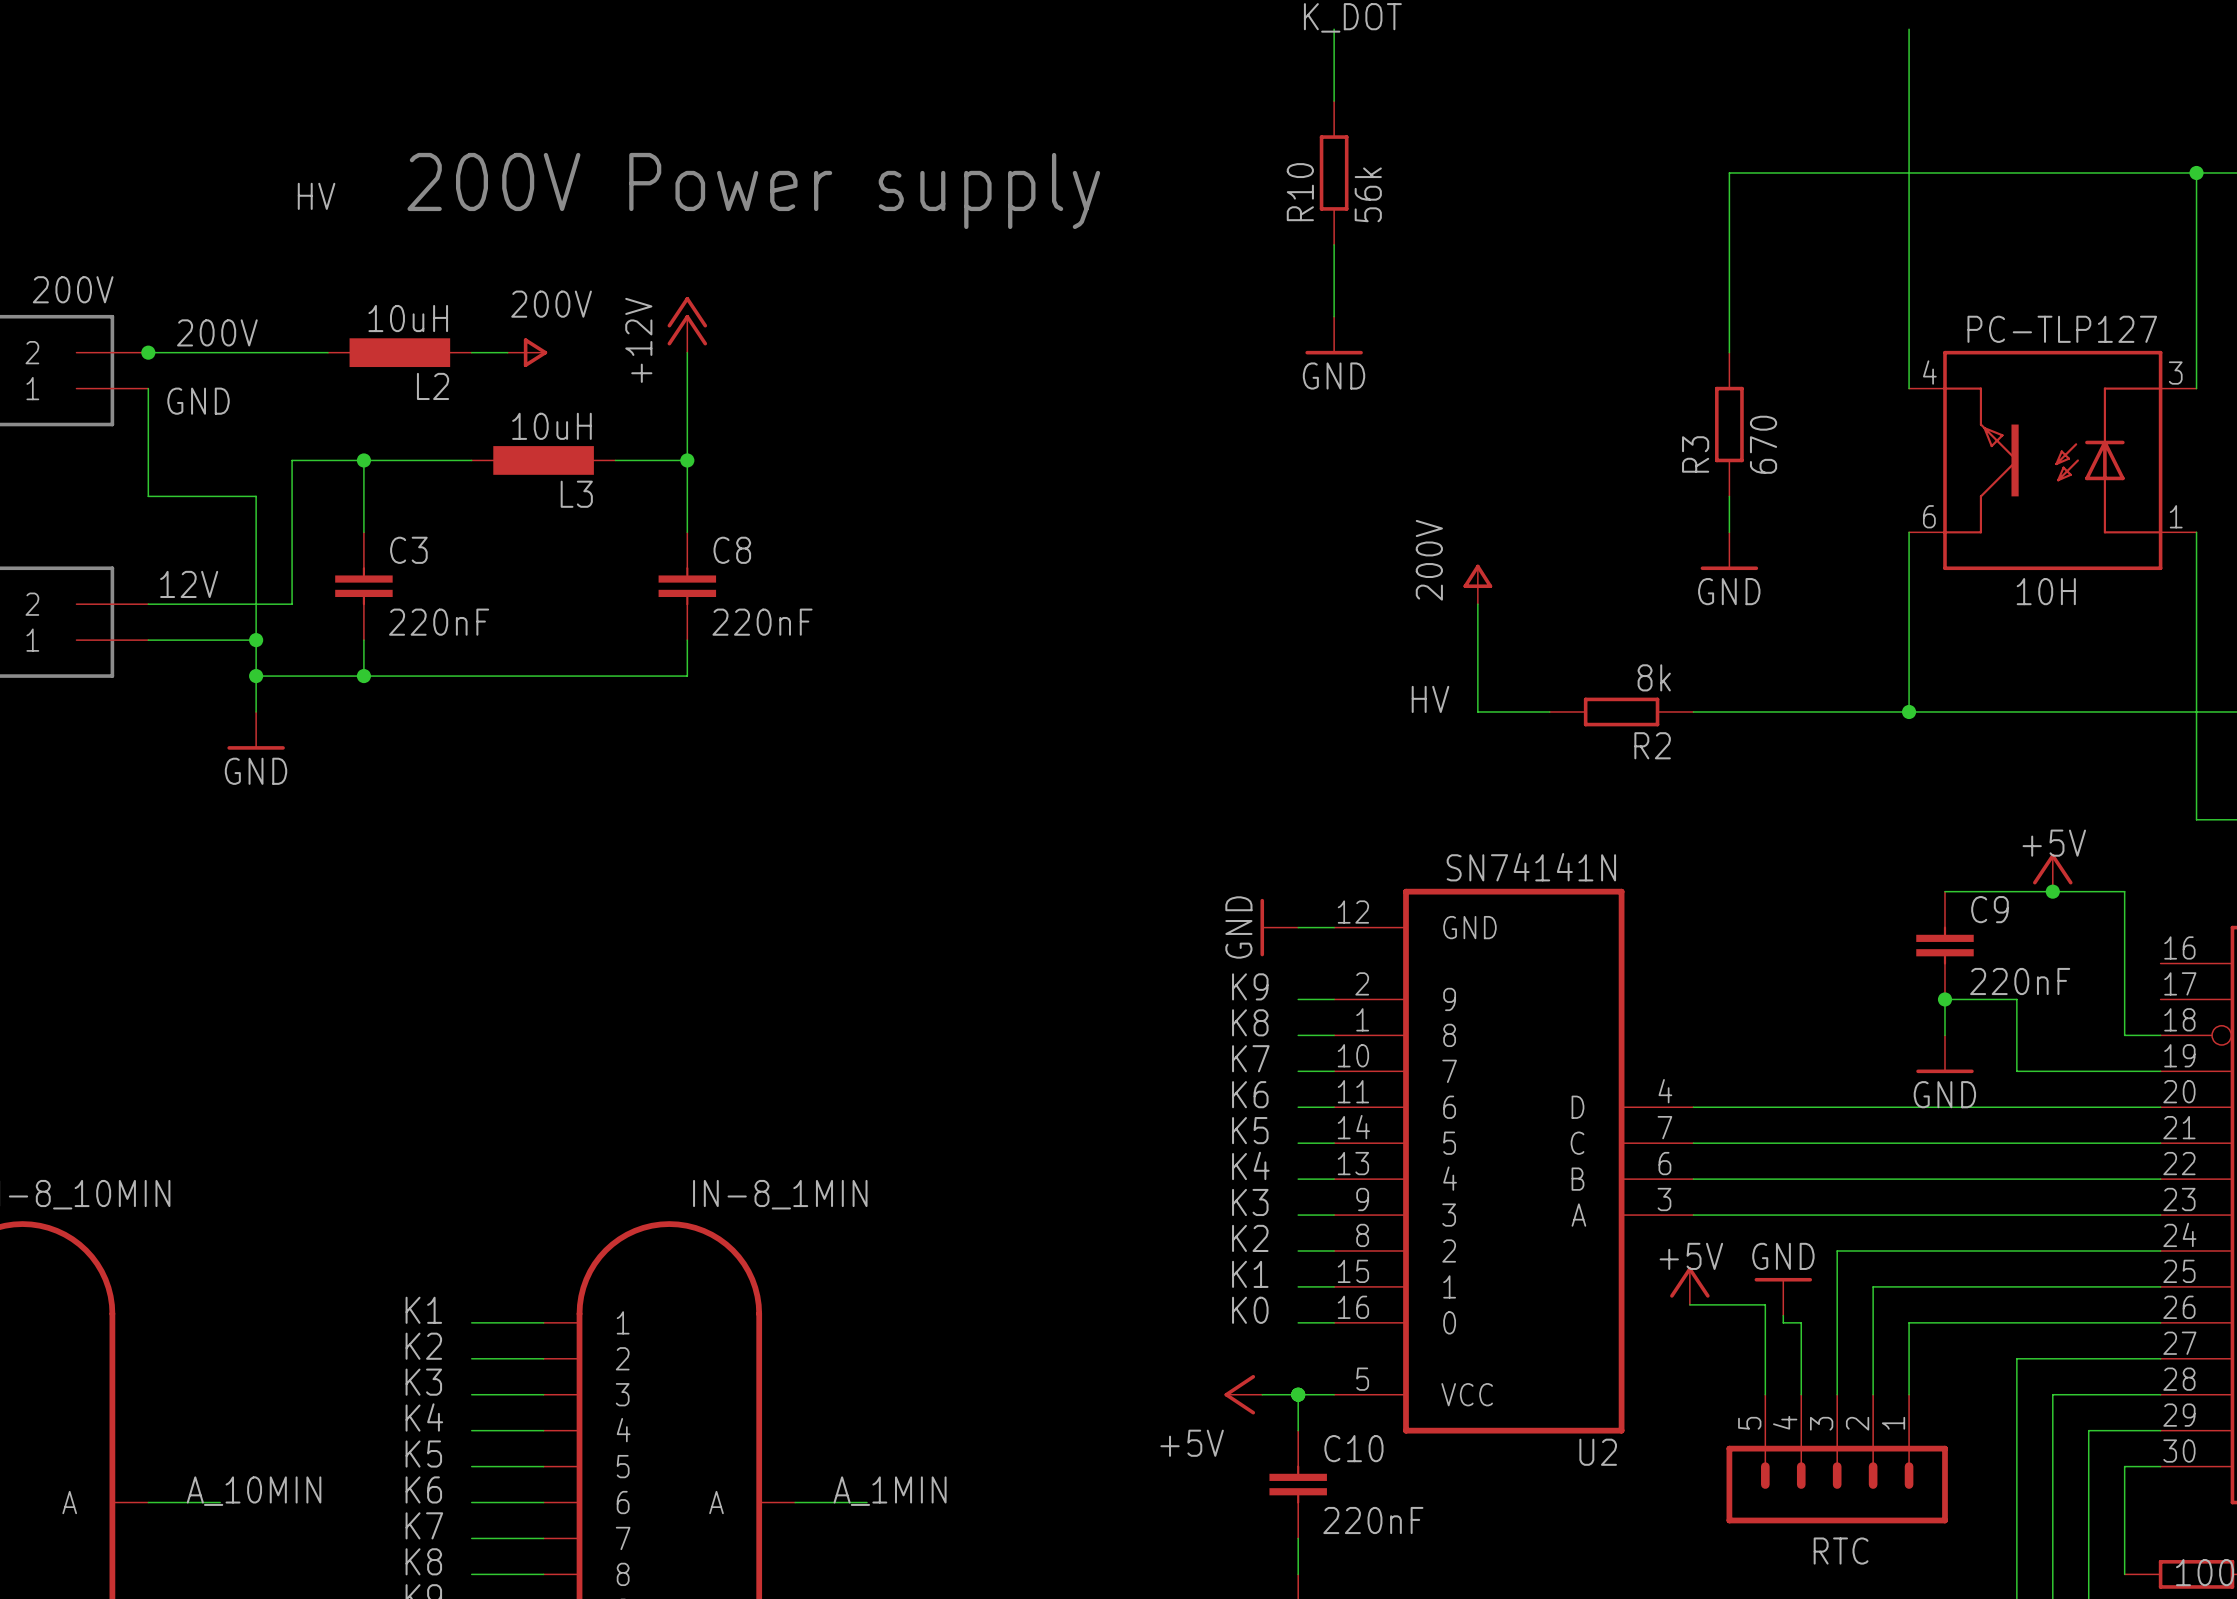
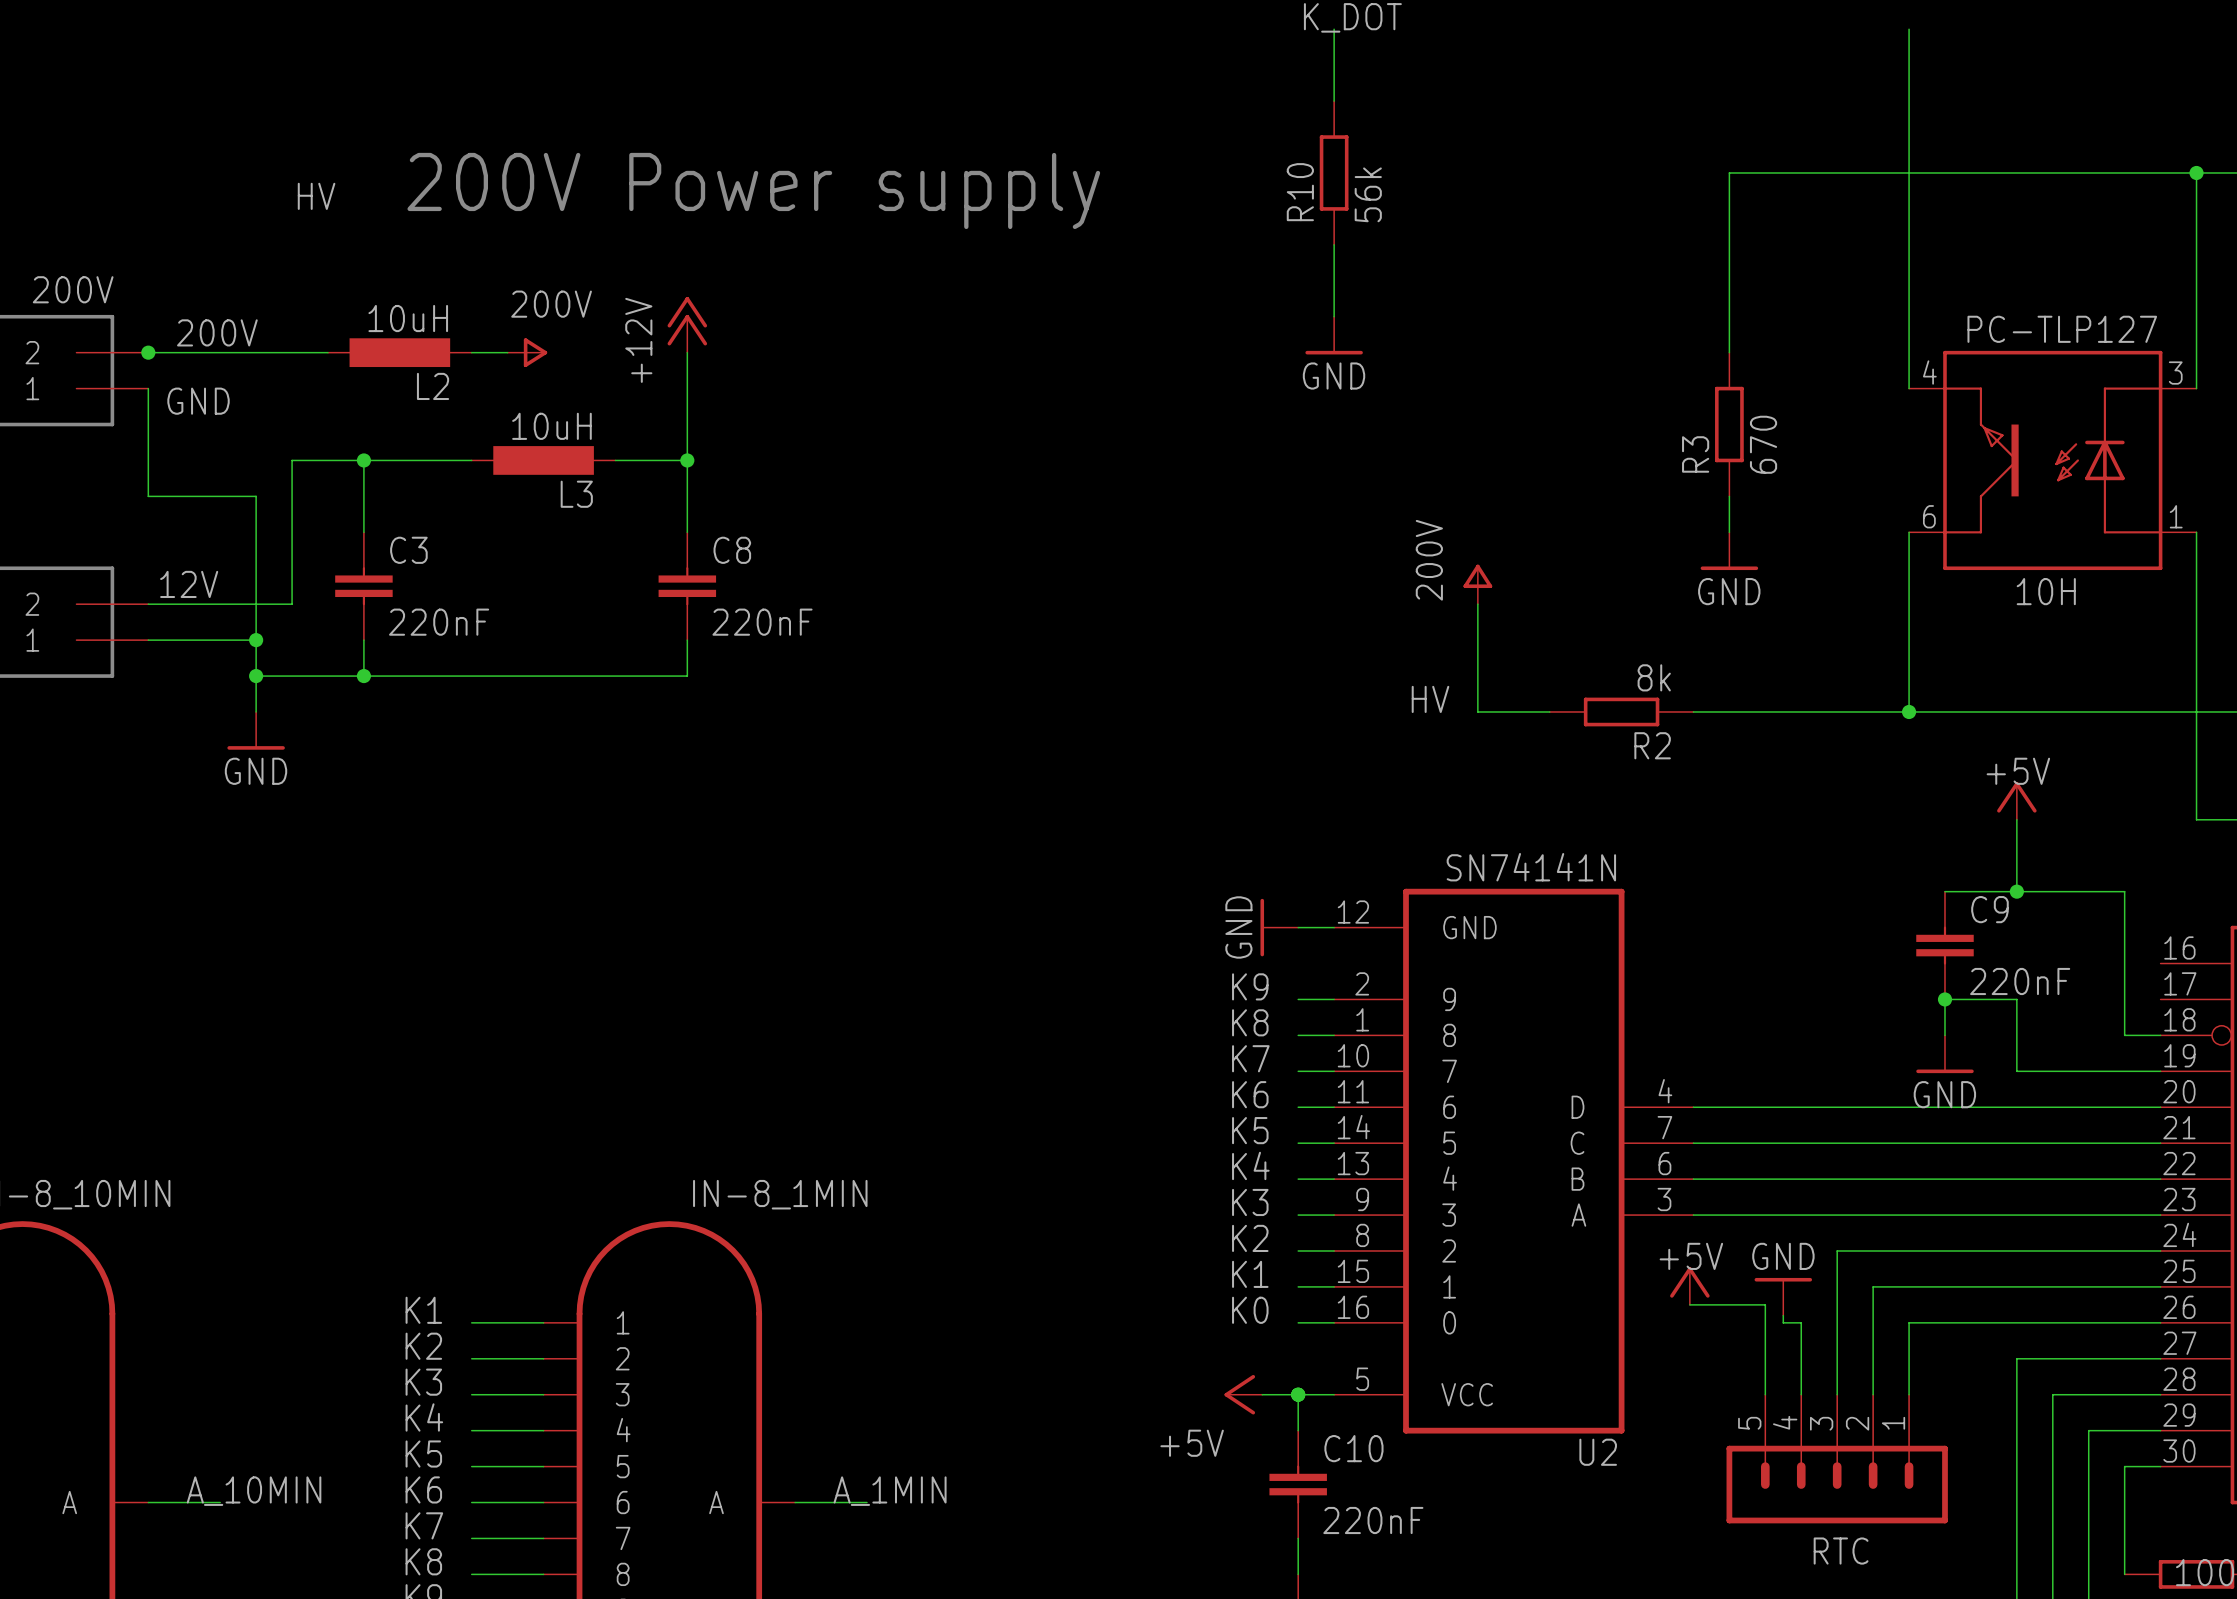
wire: none -> (2016, 819) (2016, 891)
power symbol position: +5V (2052, 872) -> +5V (2016, 800)
junction position: (2052, 891) -> (2016, 891)

